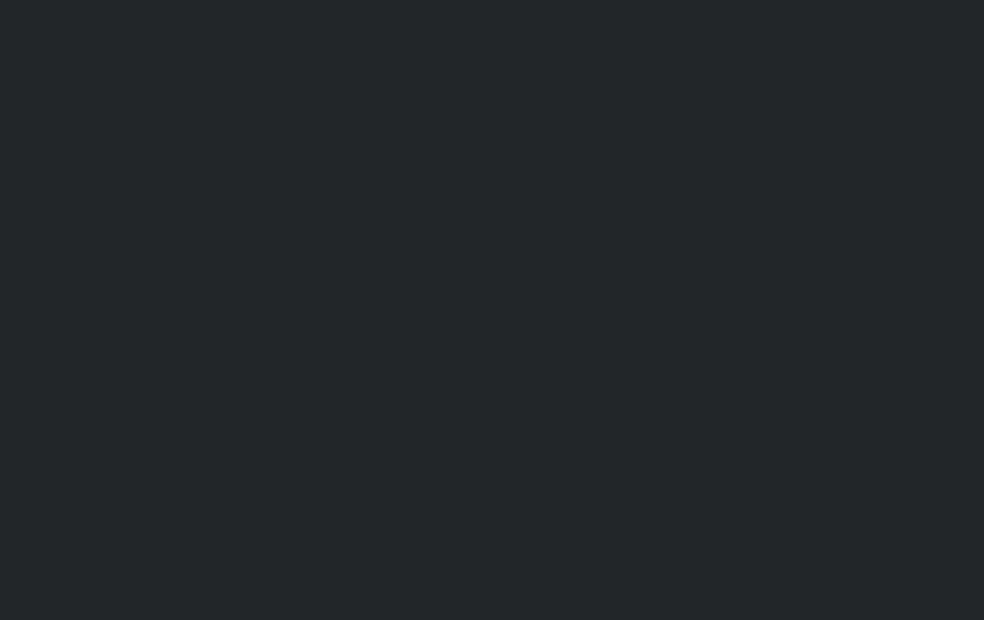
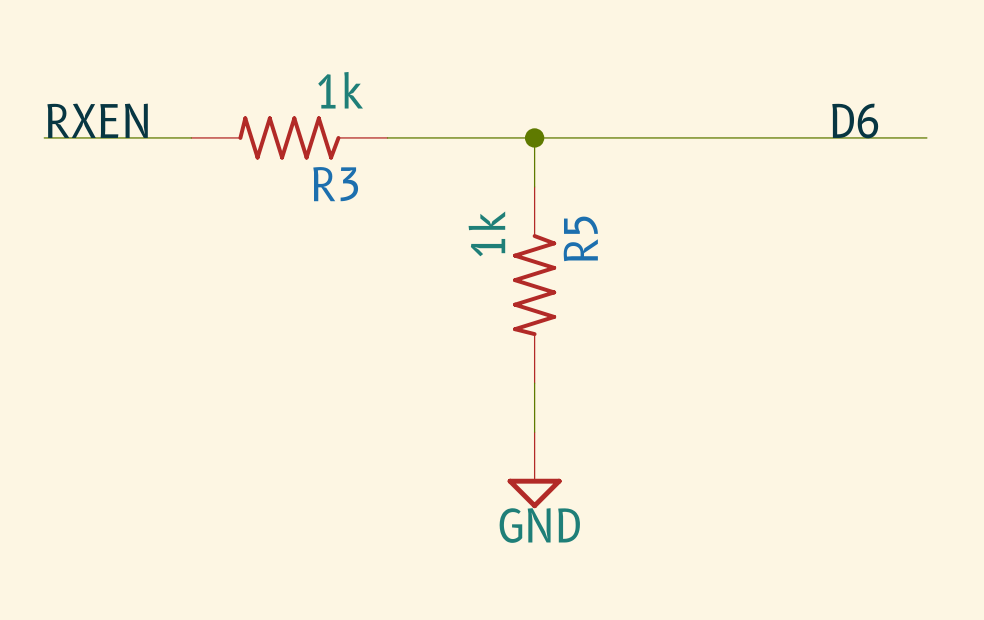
label: none -> RXEN (97, 120)
label: none -> D6 (855, 121)
wire: none -> (44, 137) (191, 137)
R3: none -> 1k (289, 137)
wire: none -> (387, 137) (926, 137)
wire: none -> (534, 137) (534, 186)
junction: none -> (534, 137)
R5: none -> 1k (534, 285)
wire: none -> (534, 383) (534, 432)
power symbol: none -> GND (534, 470)

